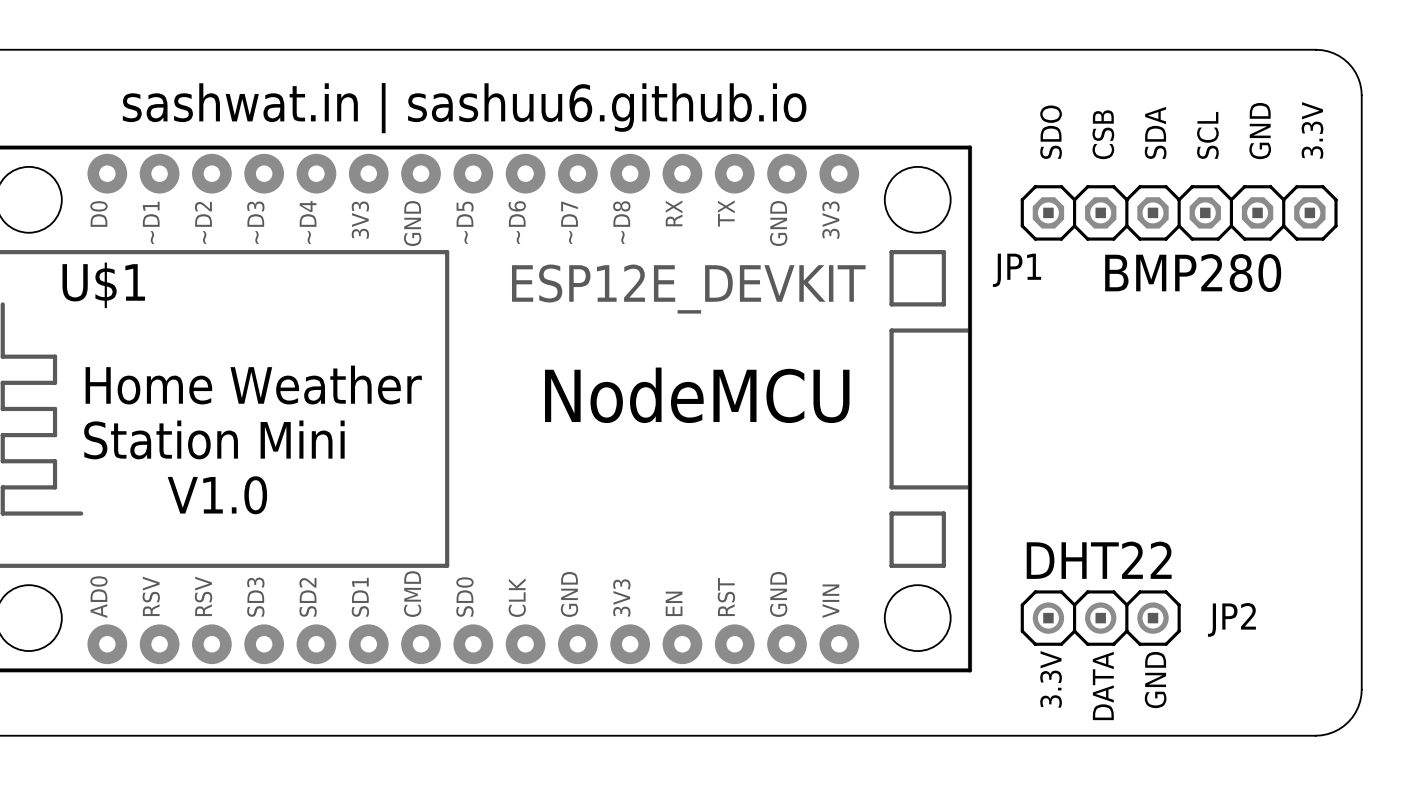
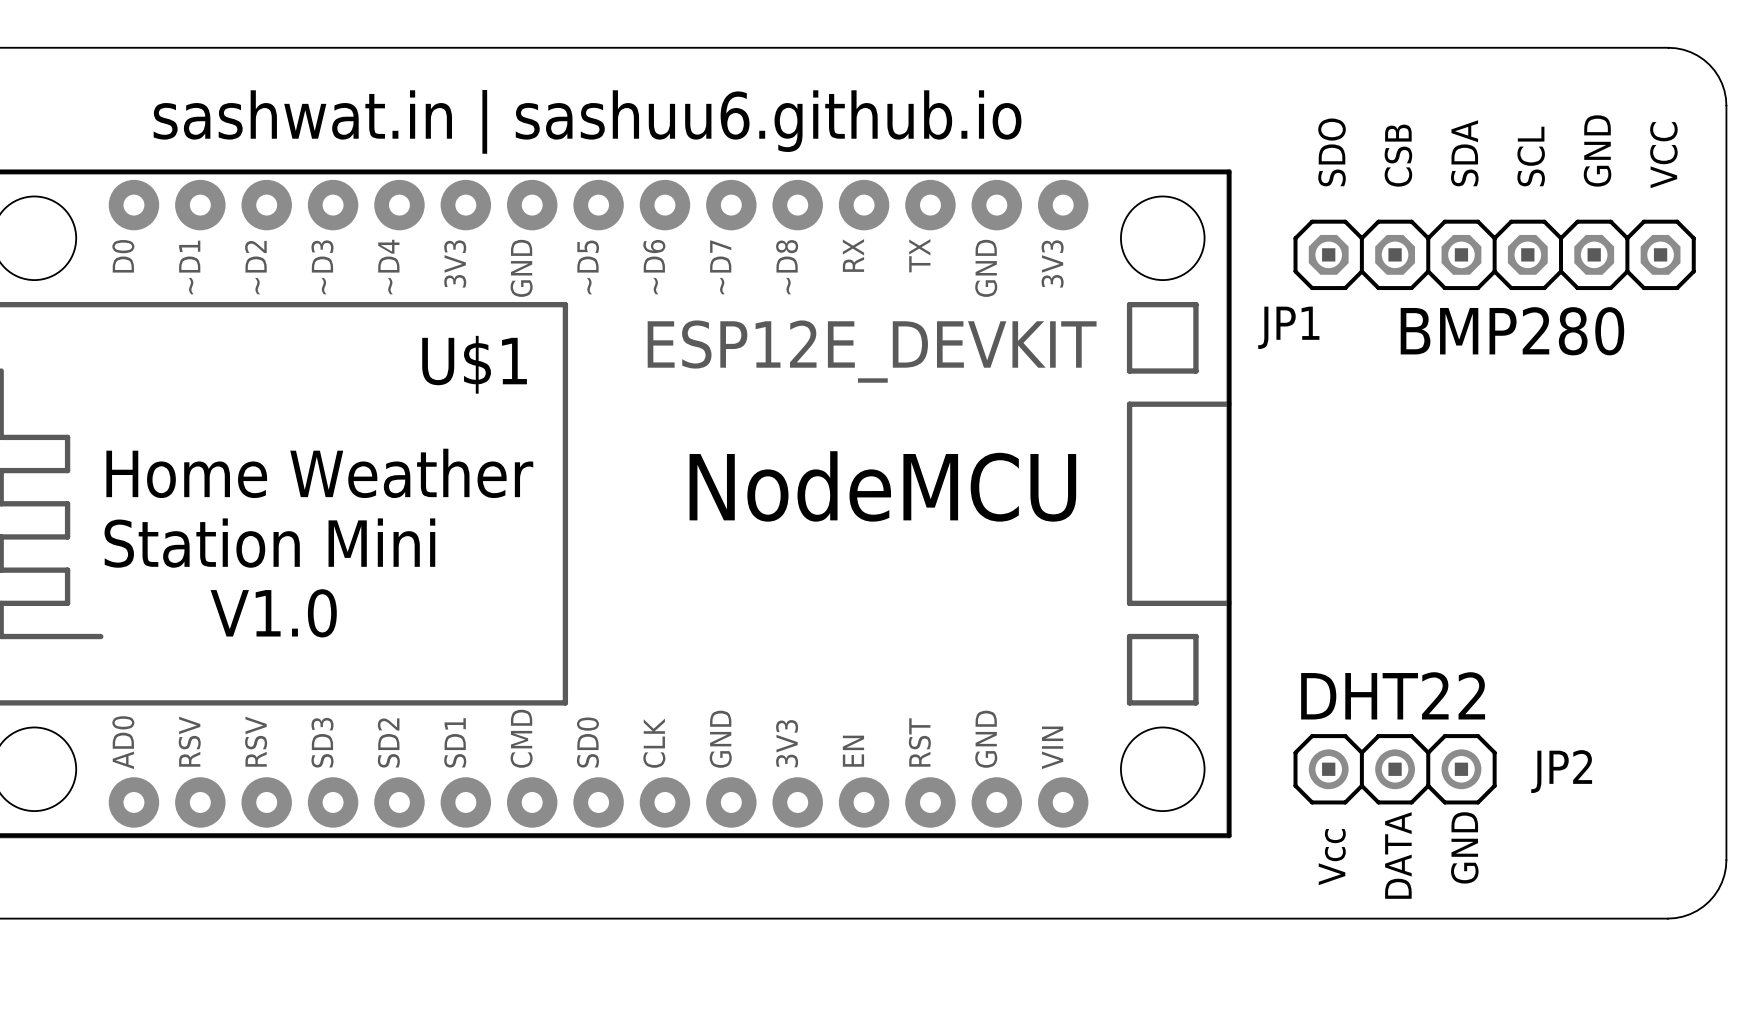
text: 3.3V (1312, 130) -> VCC (1663, 155)
U$1 name position: U$1 (103, 285) -> U$1 (474, 364)
text: 3.3V (1051, 679) -> Vcc (1332, 857)

